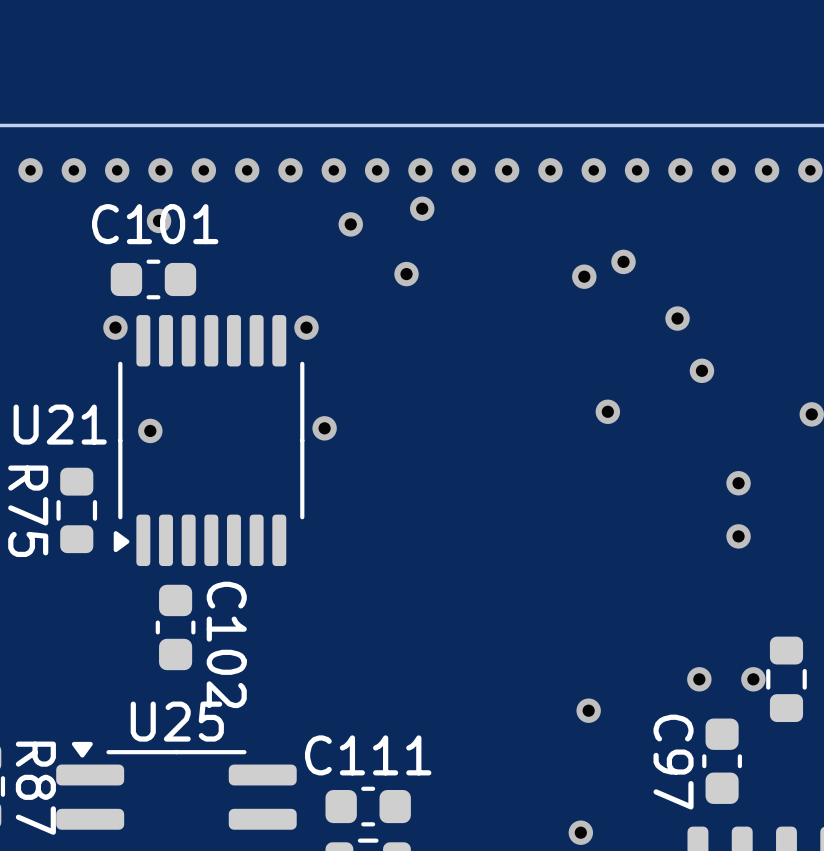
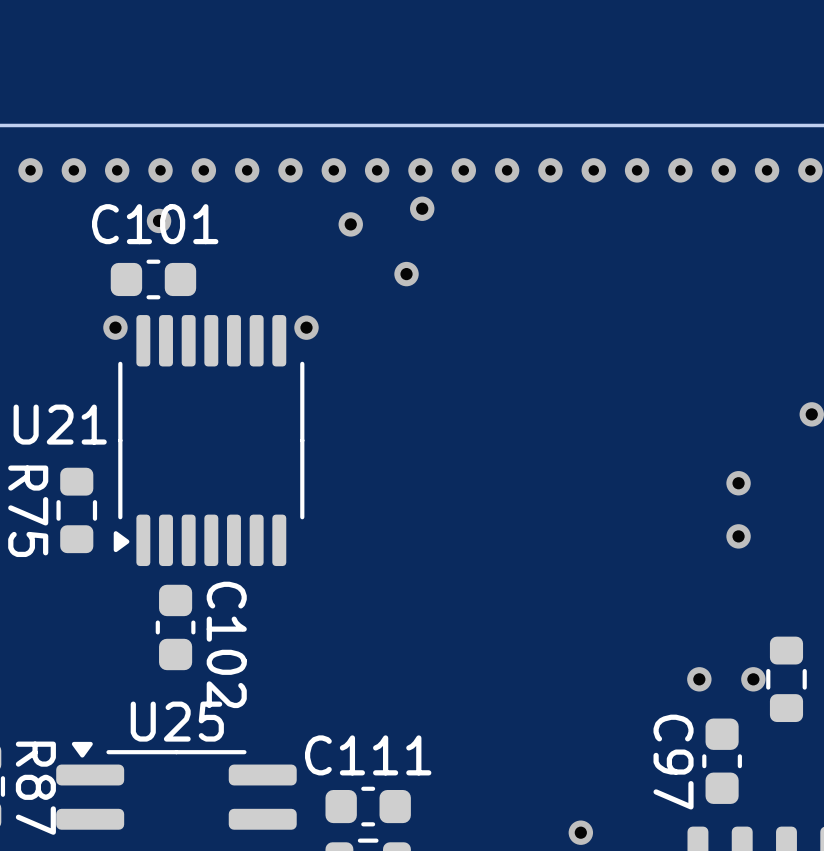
via: (623, 261) -> none
via: (584, 276) -> none
via: (677, 318) -> none
via: (701, 370) -> none
via: (607, 411) -> none
via: (324, 428) -> none
via: (150, 430) -> none
via: (588, 710) -> none

